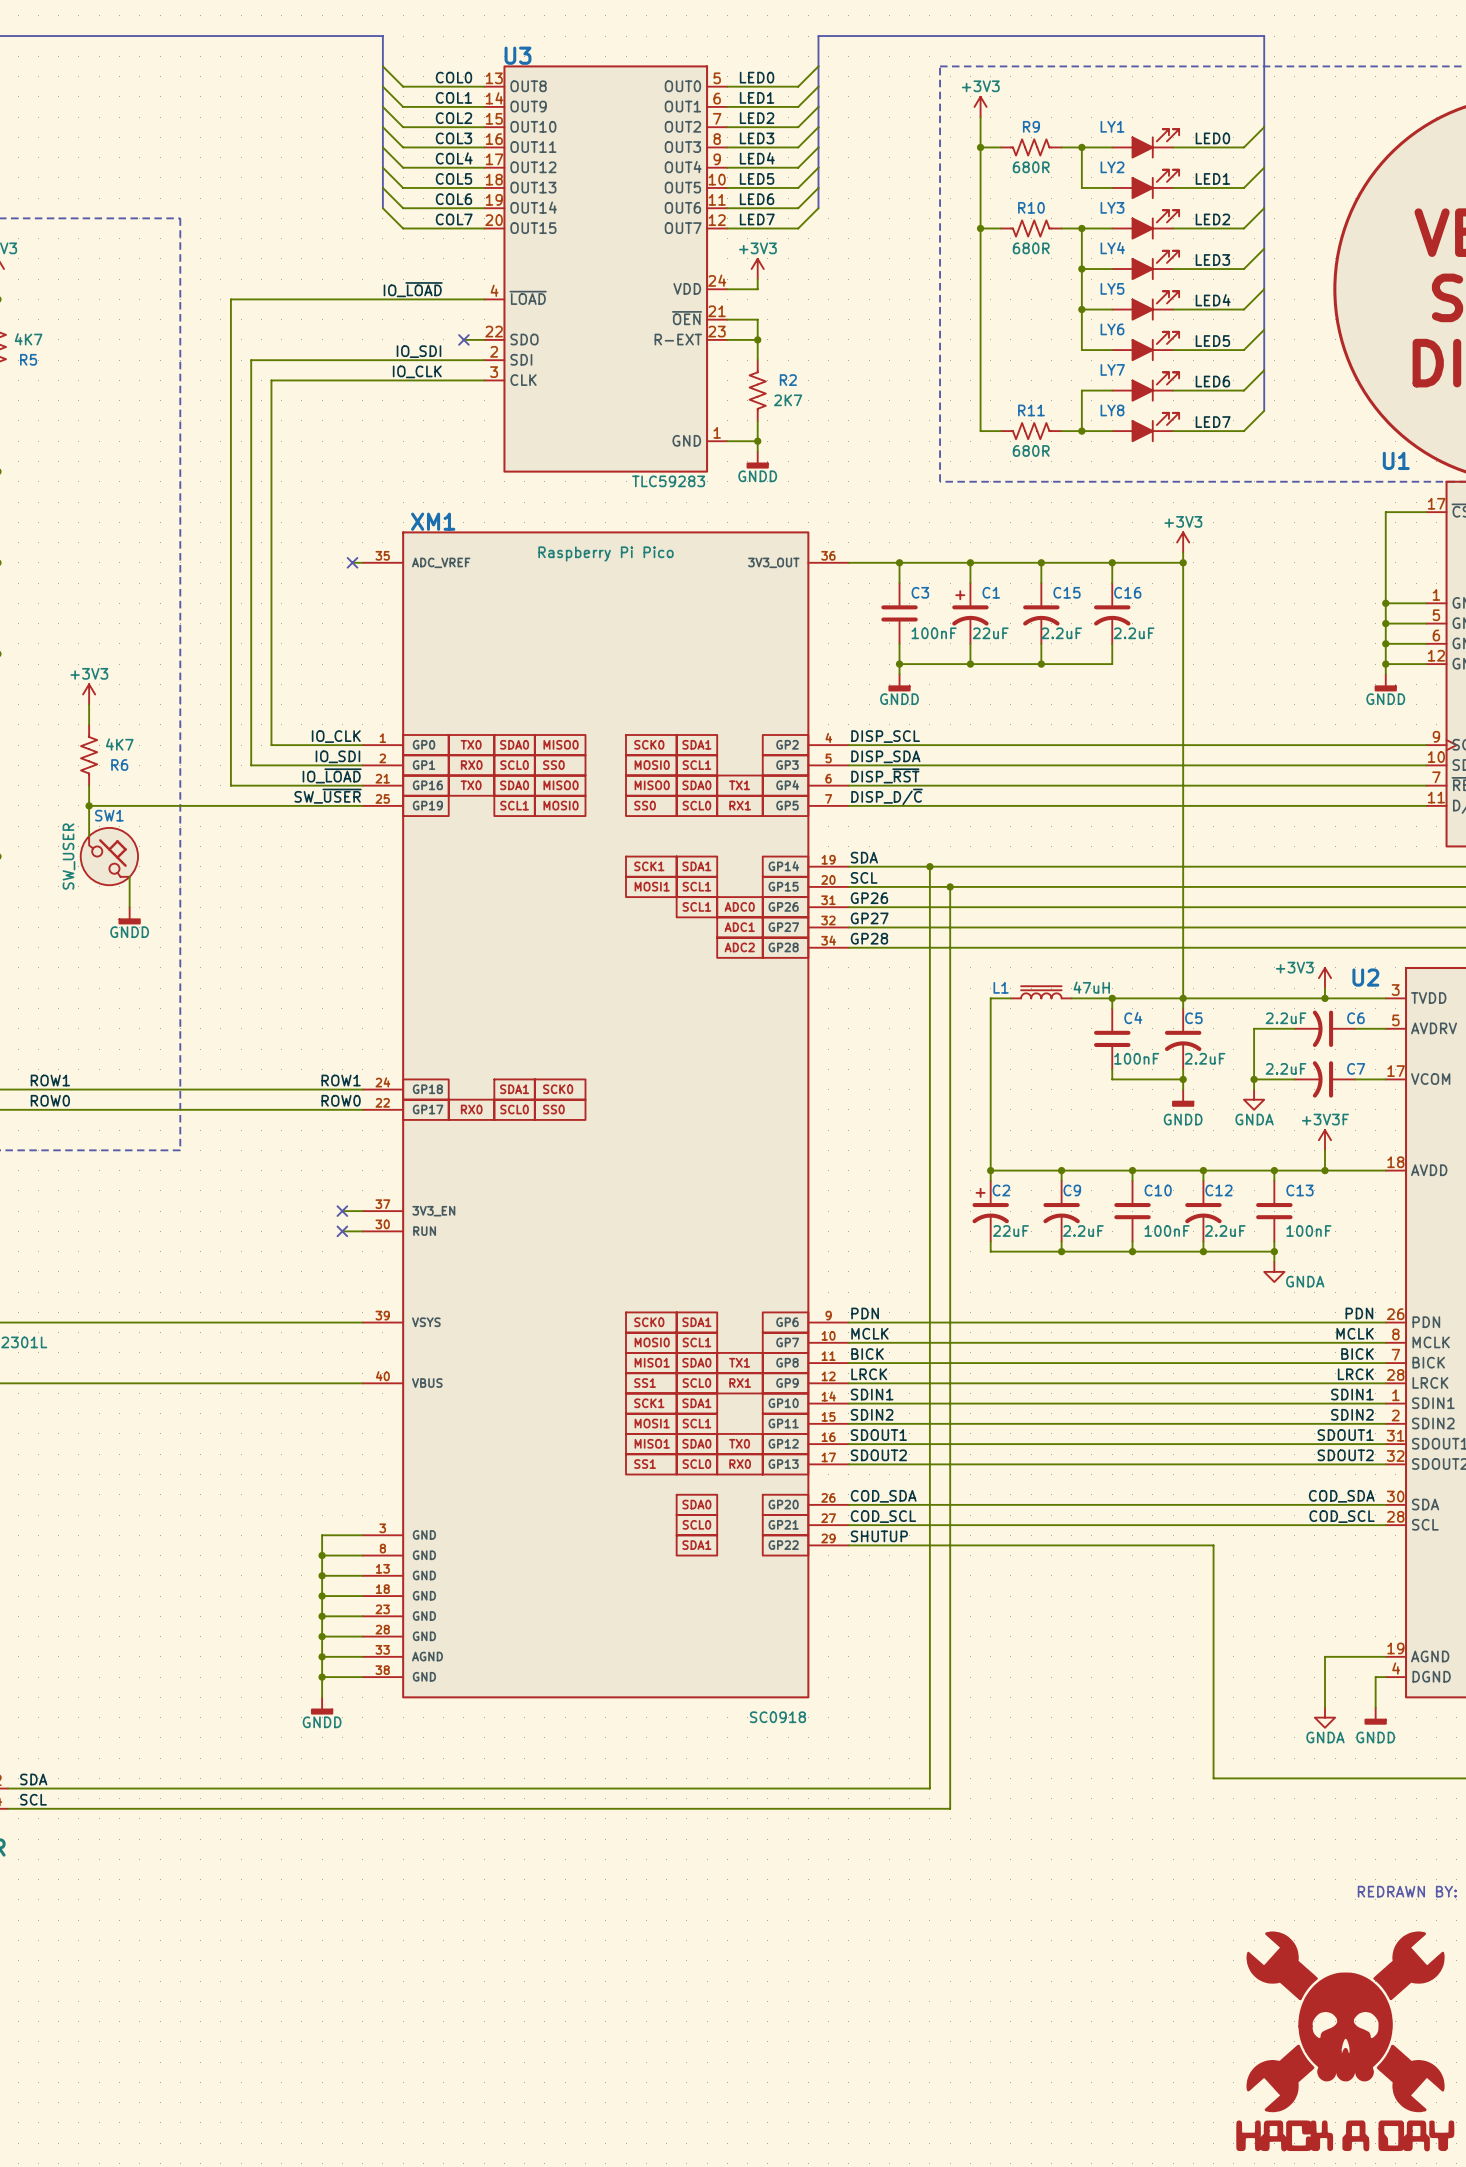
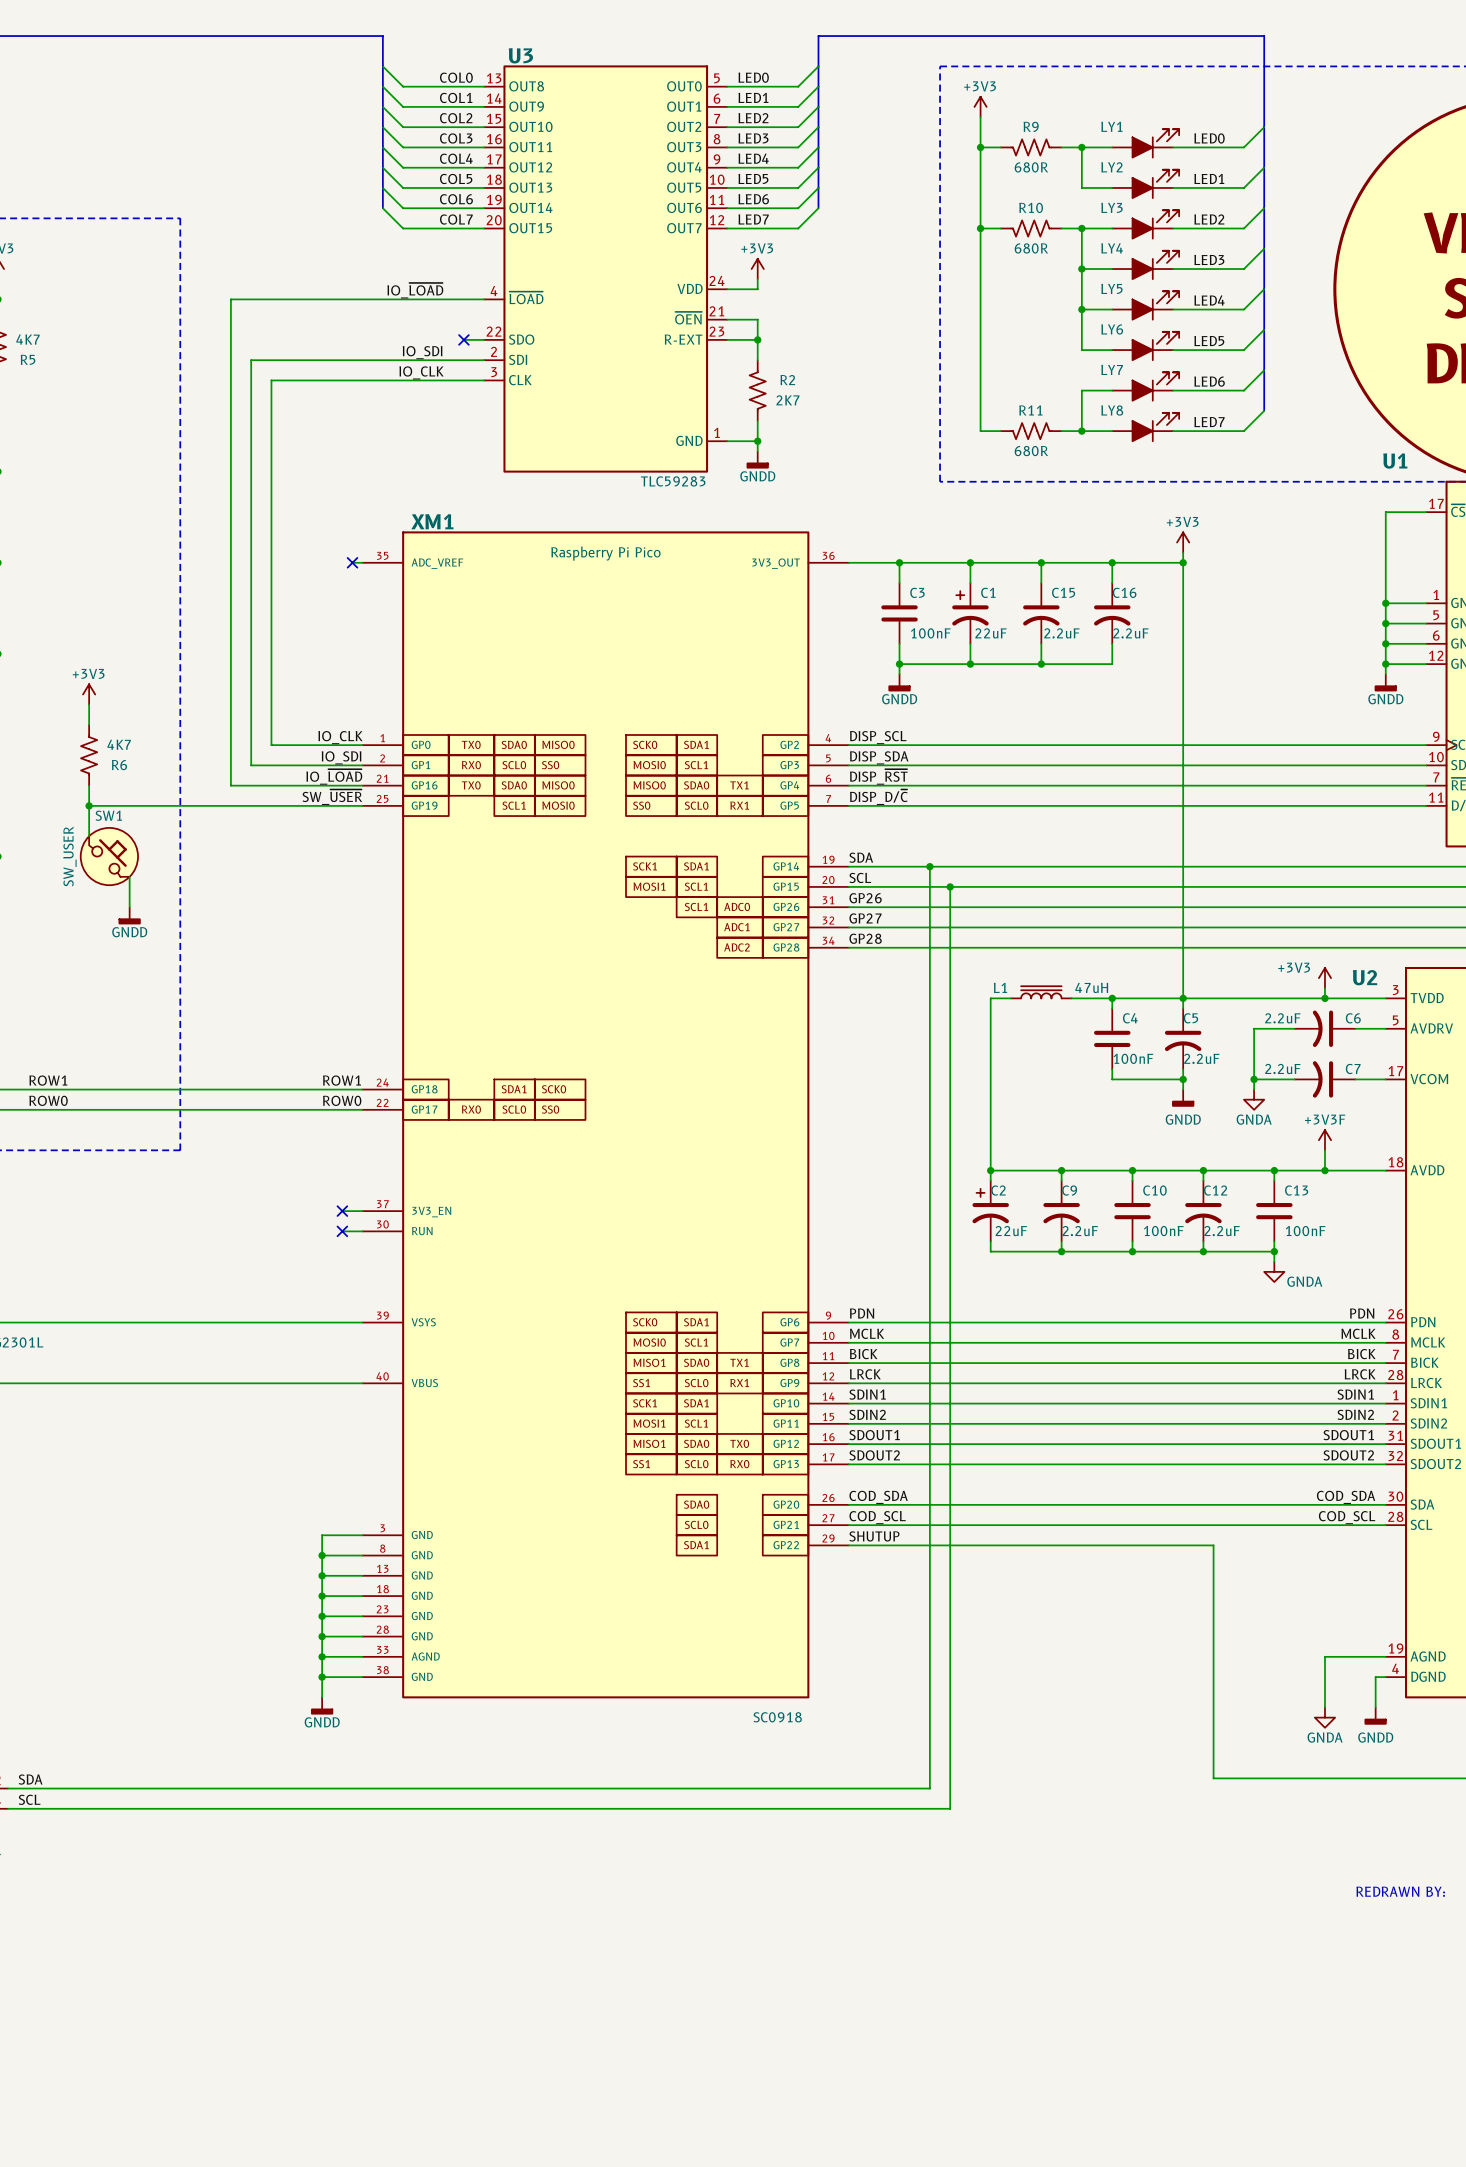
power symbol: (1345, 2021) -> none
power symbol: (1345, 2135) -> none

